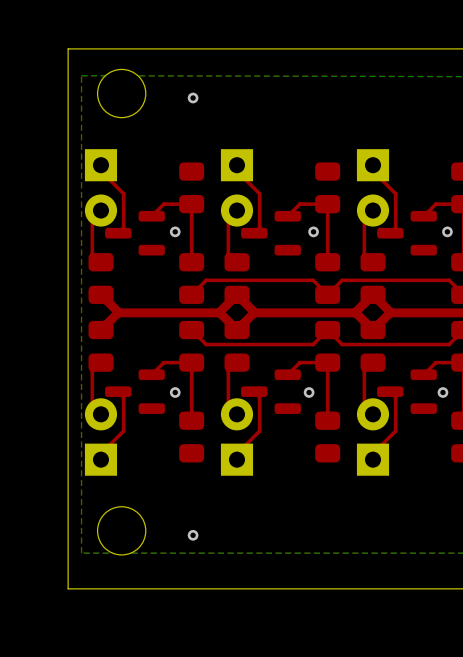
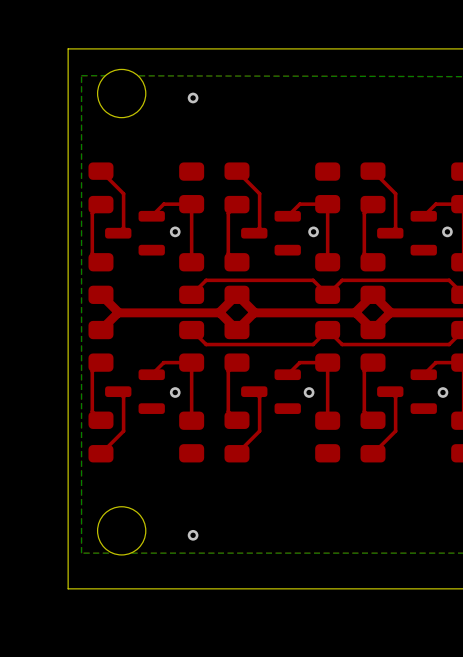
part footprint: [84, 149, 118, 227] -> [88, 162, 114, 214]
part footprint: [220, 149, 254, 227] -> [224, 162, 250, 214]
part footprint: [356, 149, 390, 227] -> [360, 162, 386, 214]
part footprint: [84, 398, 118, 476] -> [88, 411, 114, 463]
part footprint: [220, 398, 254, 476] -> [224, 411, 250, 463]
part footprint: [356, 398, 390, 476] -> [360, 411, 386, 463]

